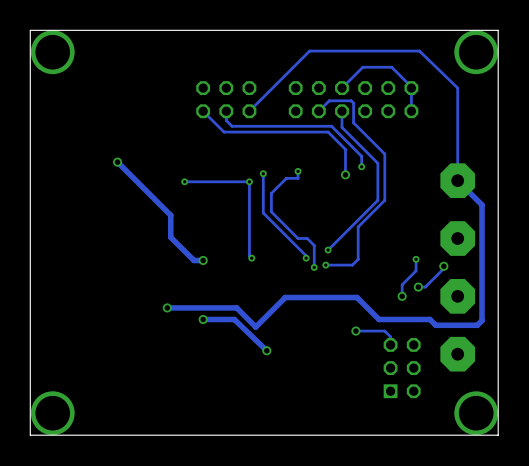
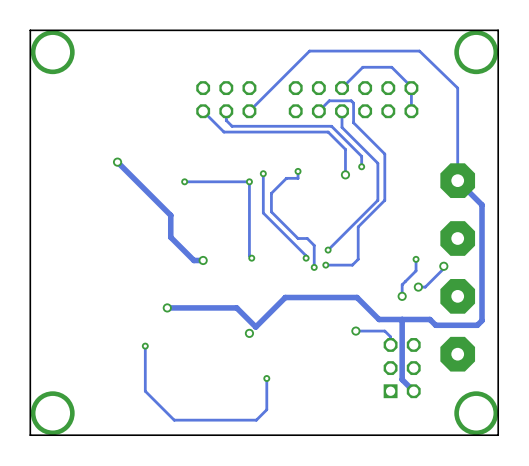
track: (203, 319) (234, 319) (266, 350) -> none
via: (203, 319) -> none
track: none -> (402, 319) (402, 379) (413, 391)
via: none -> (249, 333)
track: none -> (145, 346) (145, 391) (174, 420) (256, 420) (266, 409) (266, 378)
via: none -> (145, 346)
via: (266, 350) -> none
via: none -> (266, 378)

